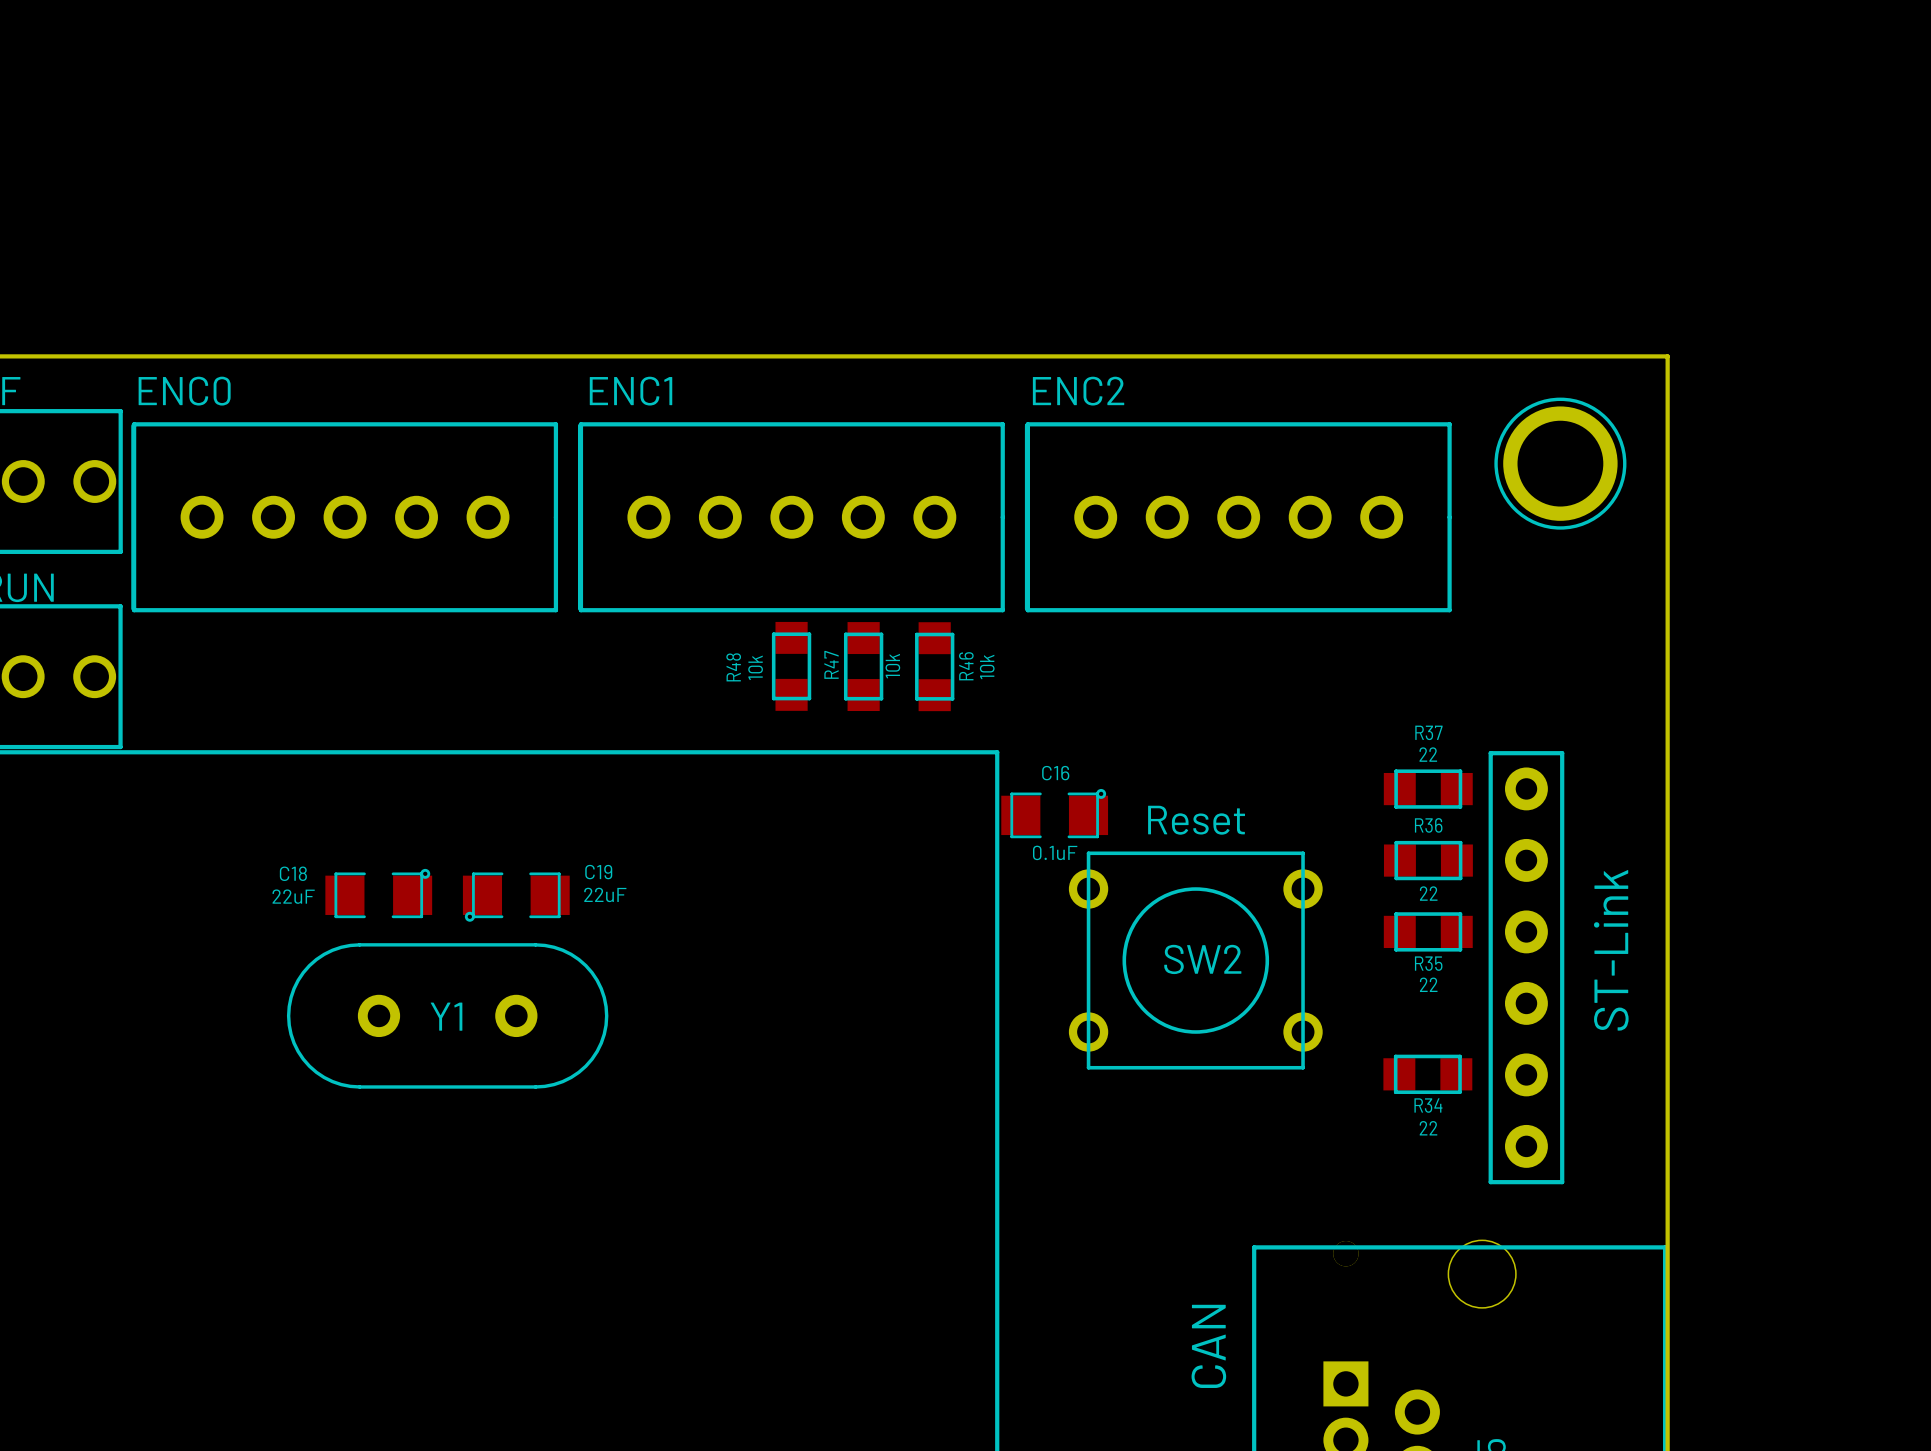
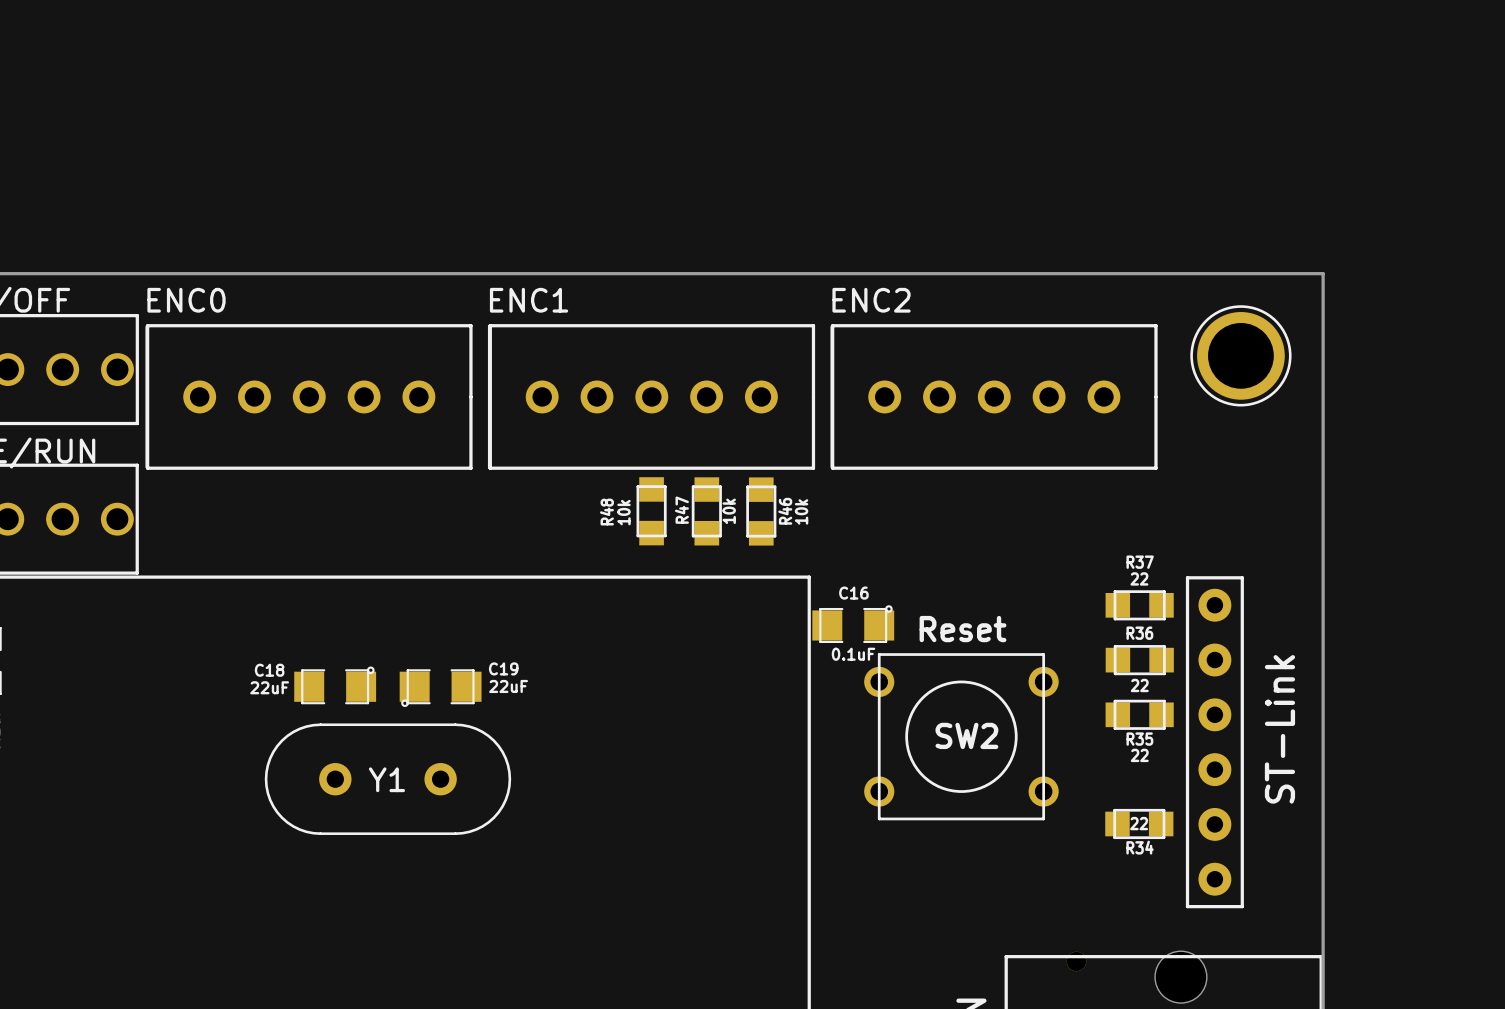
R34 value position: 22 (1428, 1128) -> 22 (1139, 823)

